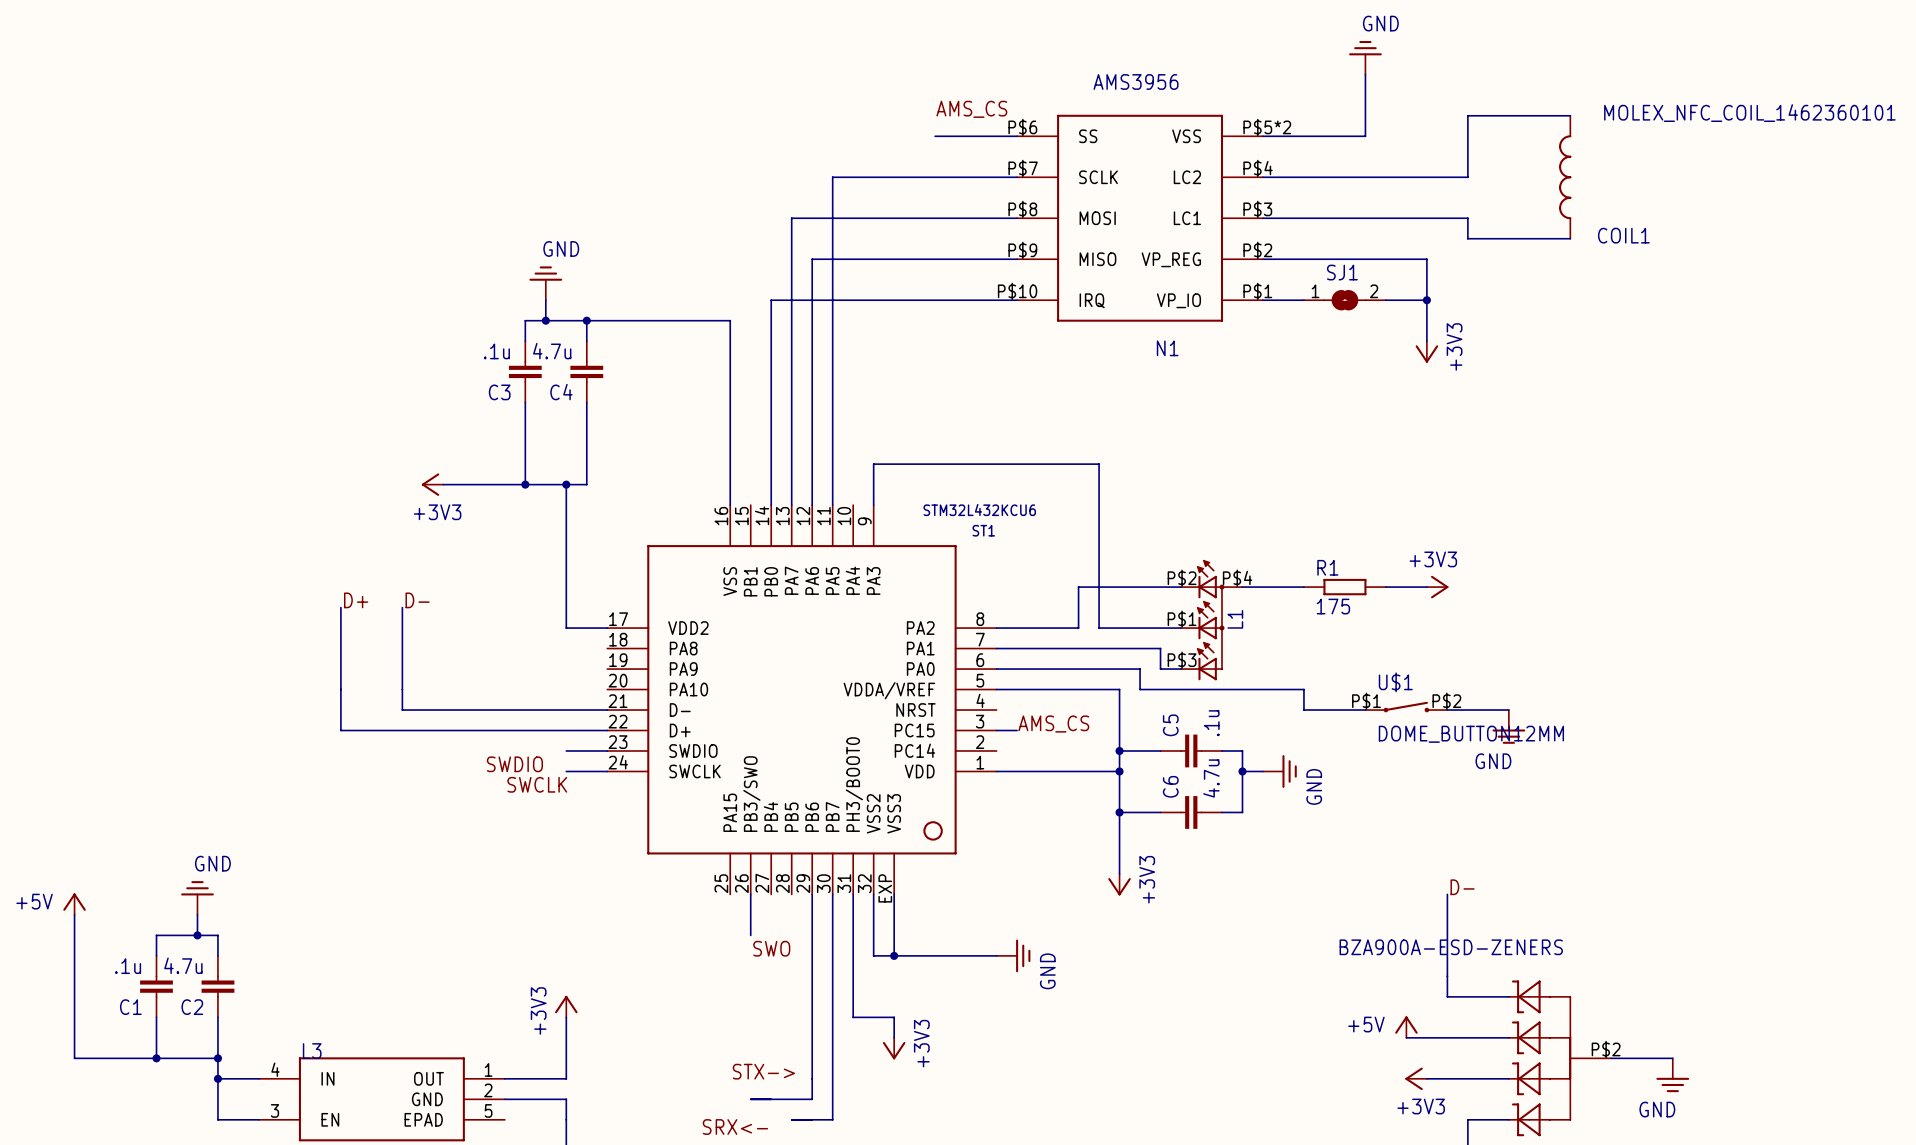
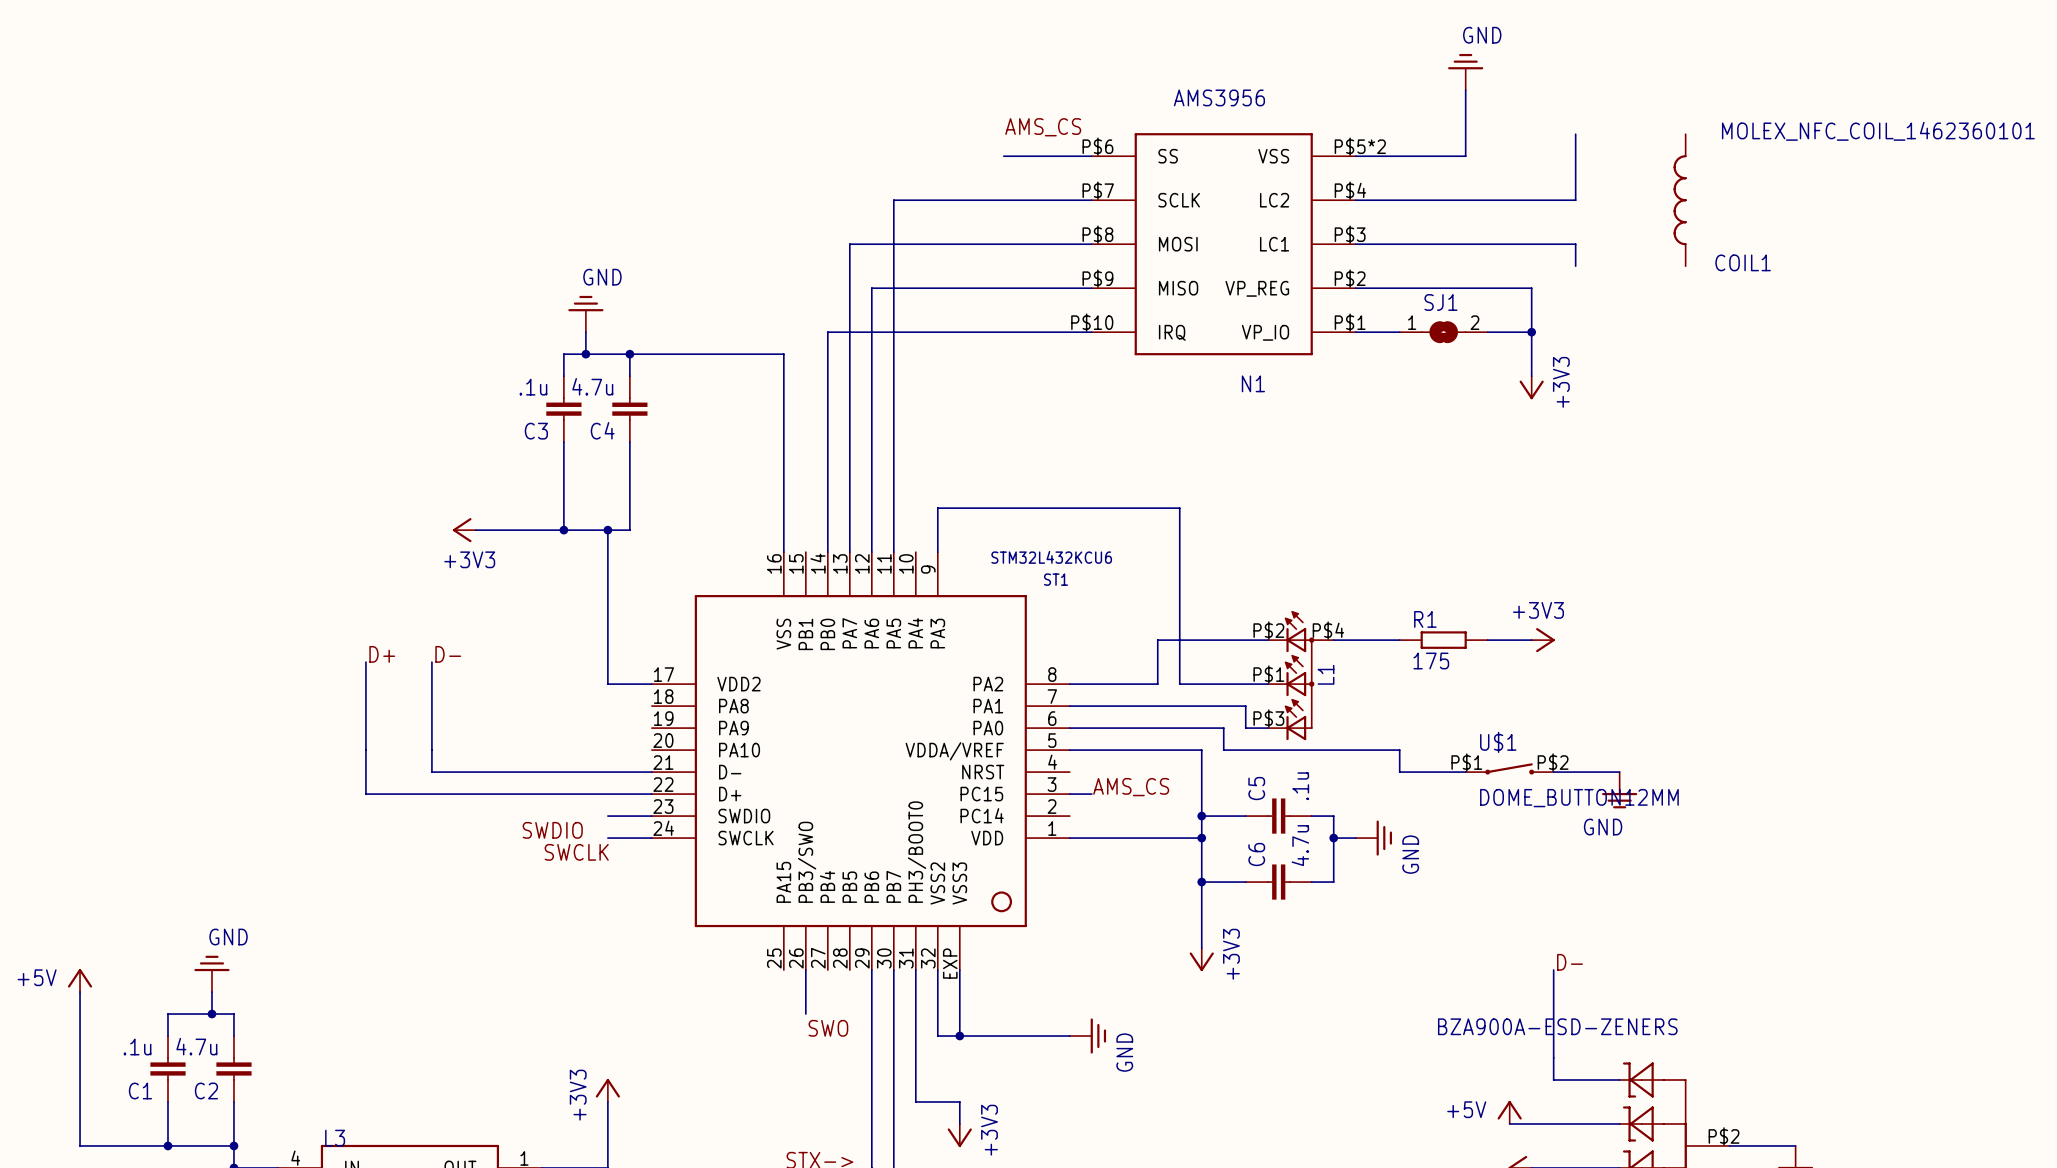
wire: (1467, 115) (1570, 115) -> none
wire: (1467, 238) (1570, 238) -> none

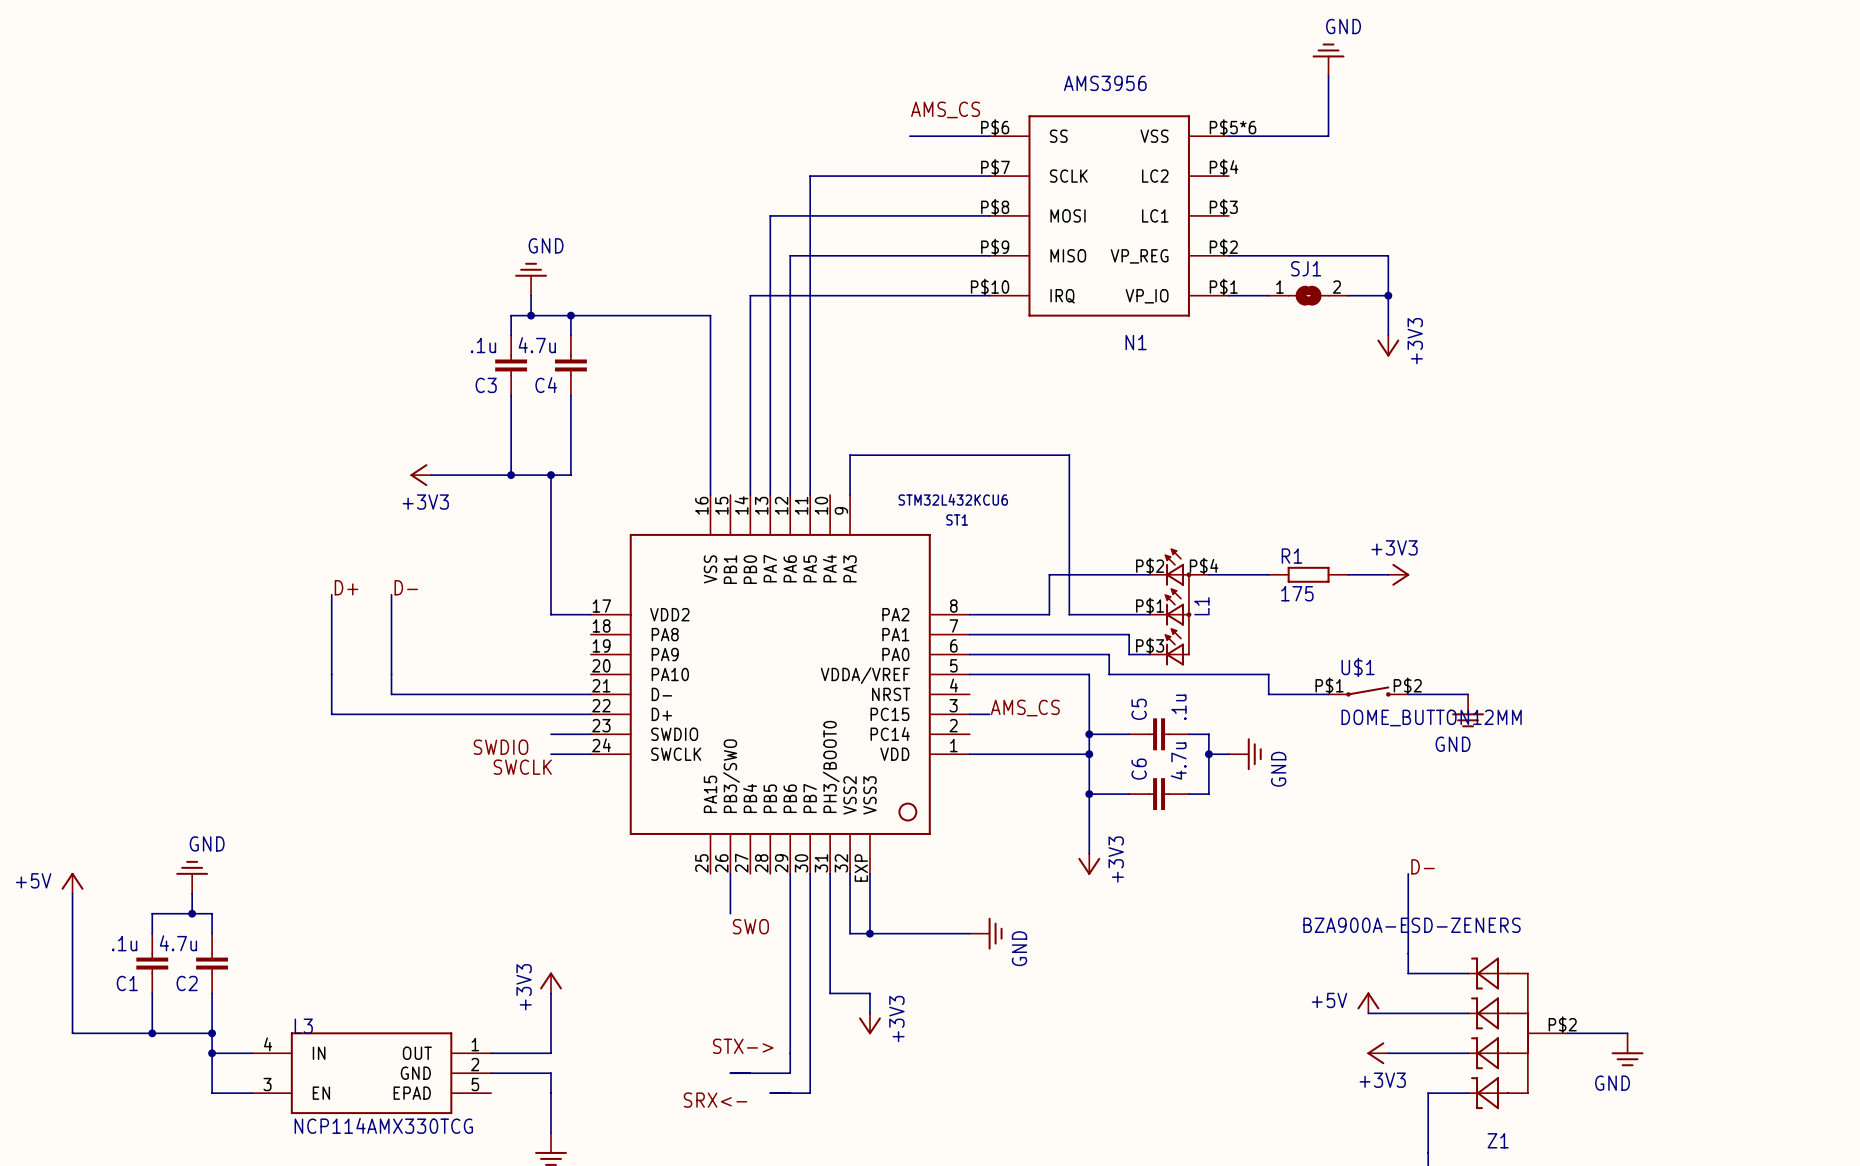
wire: (1575, 134) (1575, 200) (1355, 200) -> none
N1 pin number: P$5*2 (1360, 146) -> P$5*6 (1233, 127)
COIL1: MOLEX_NFC_COIL_1462360101 (1680, 200) -> none
wire: (1355, 244) (1575, 244) (1575, 266) -> none

